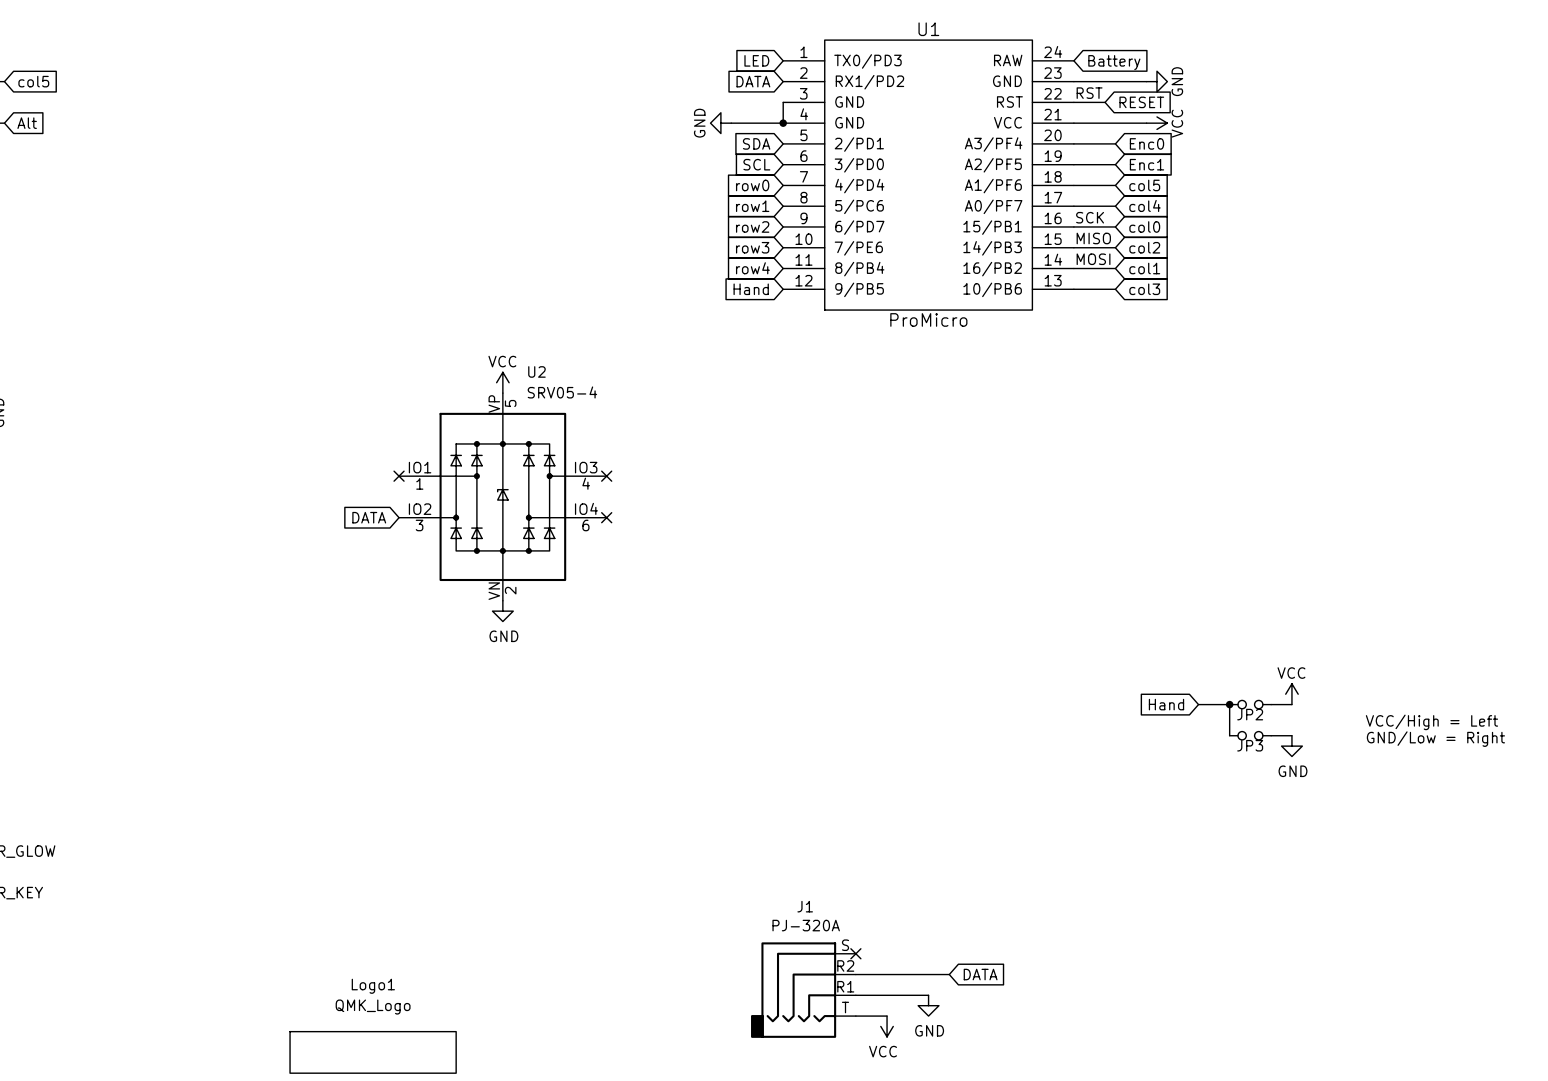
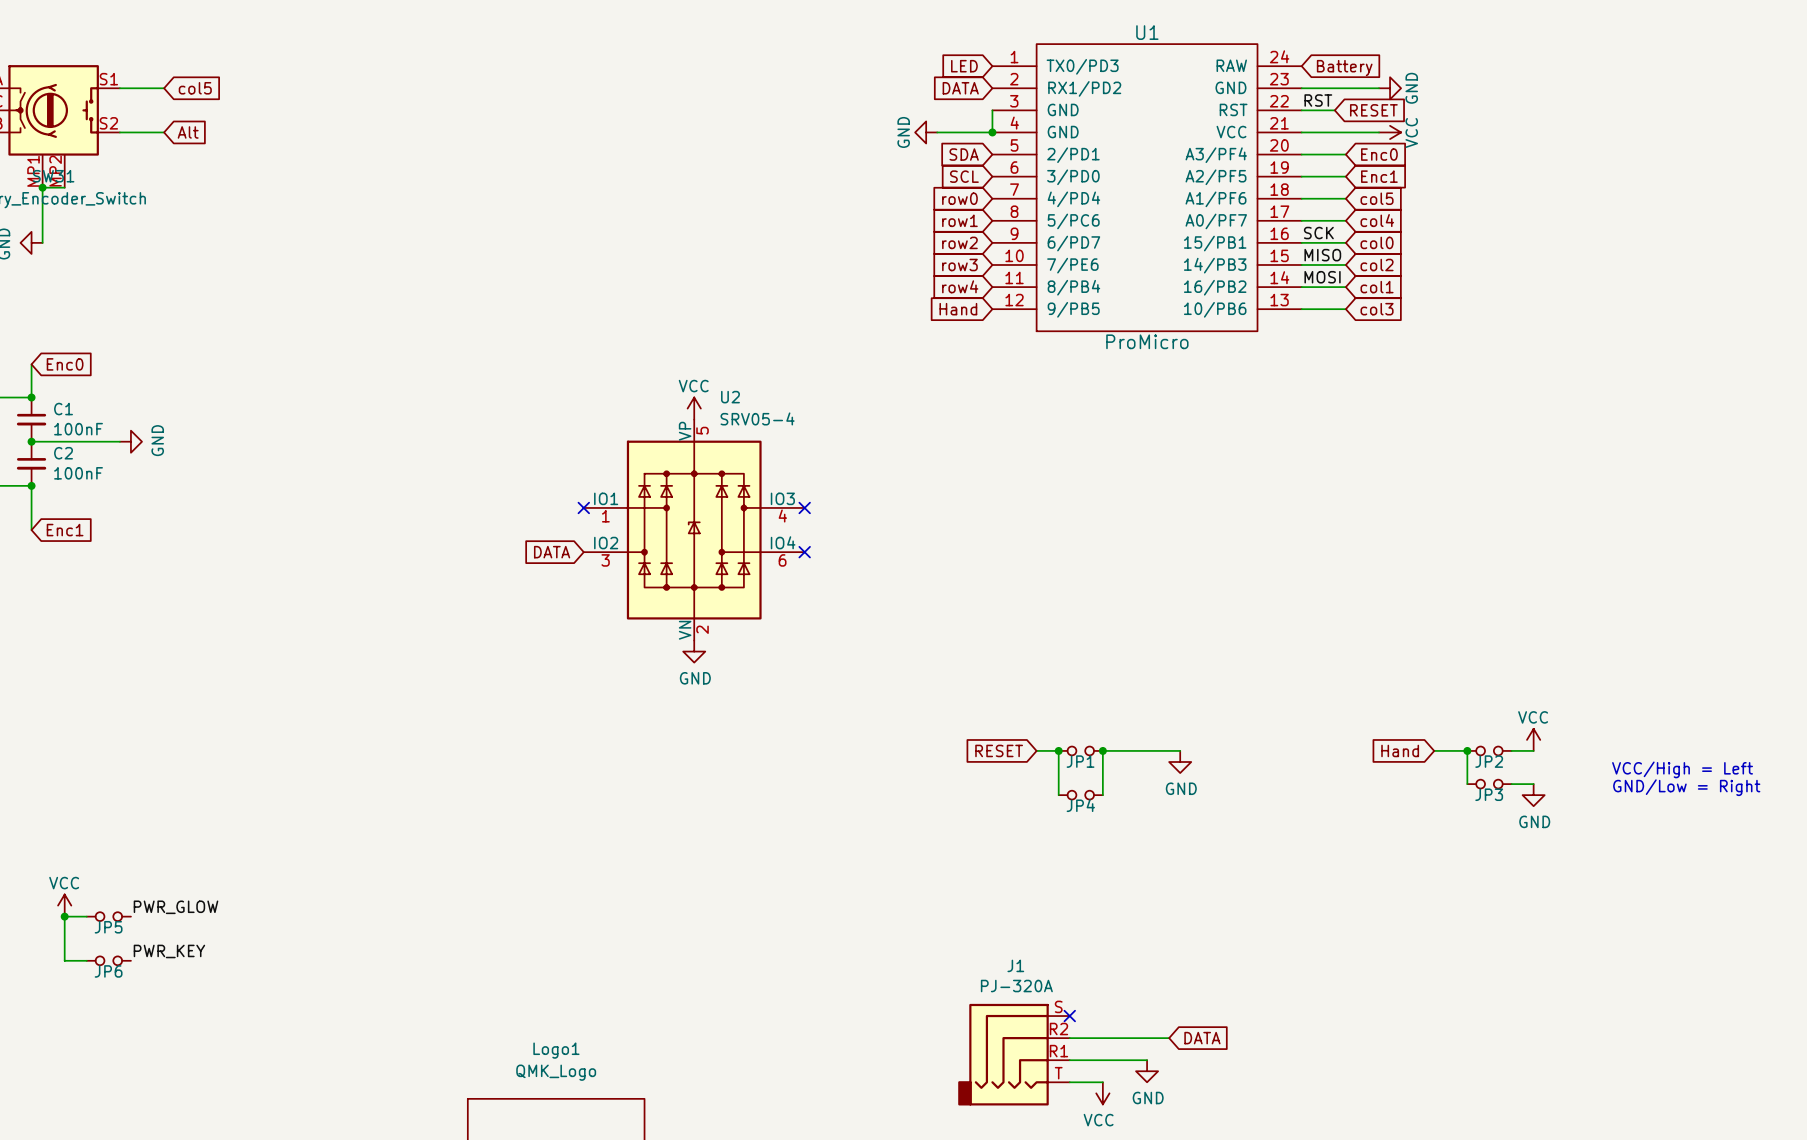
global label: none -> RESET (999, 750)
wire: none -> (1036, 750) (1058, 750) (1058, 795)
junction: none -> (1058, 750)
JP1: none -> (1080, 750)
junction: none -> (1102, 750)
wire: none -> (1180, 750) (1102, 750) (1102, 795)
power symbol: none -> GND (1180, 762)
JP4: none -> (1080, 795)

